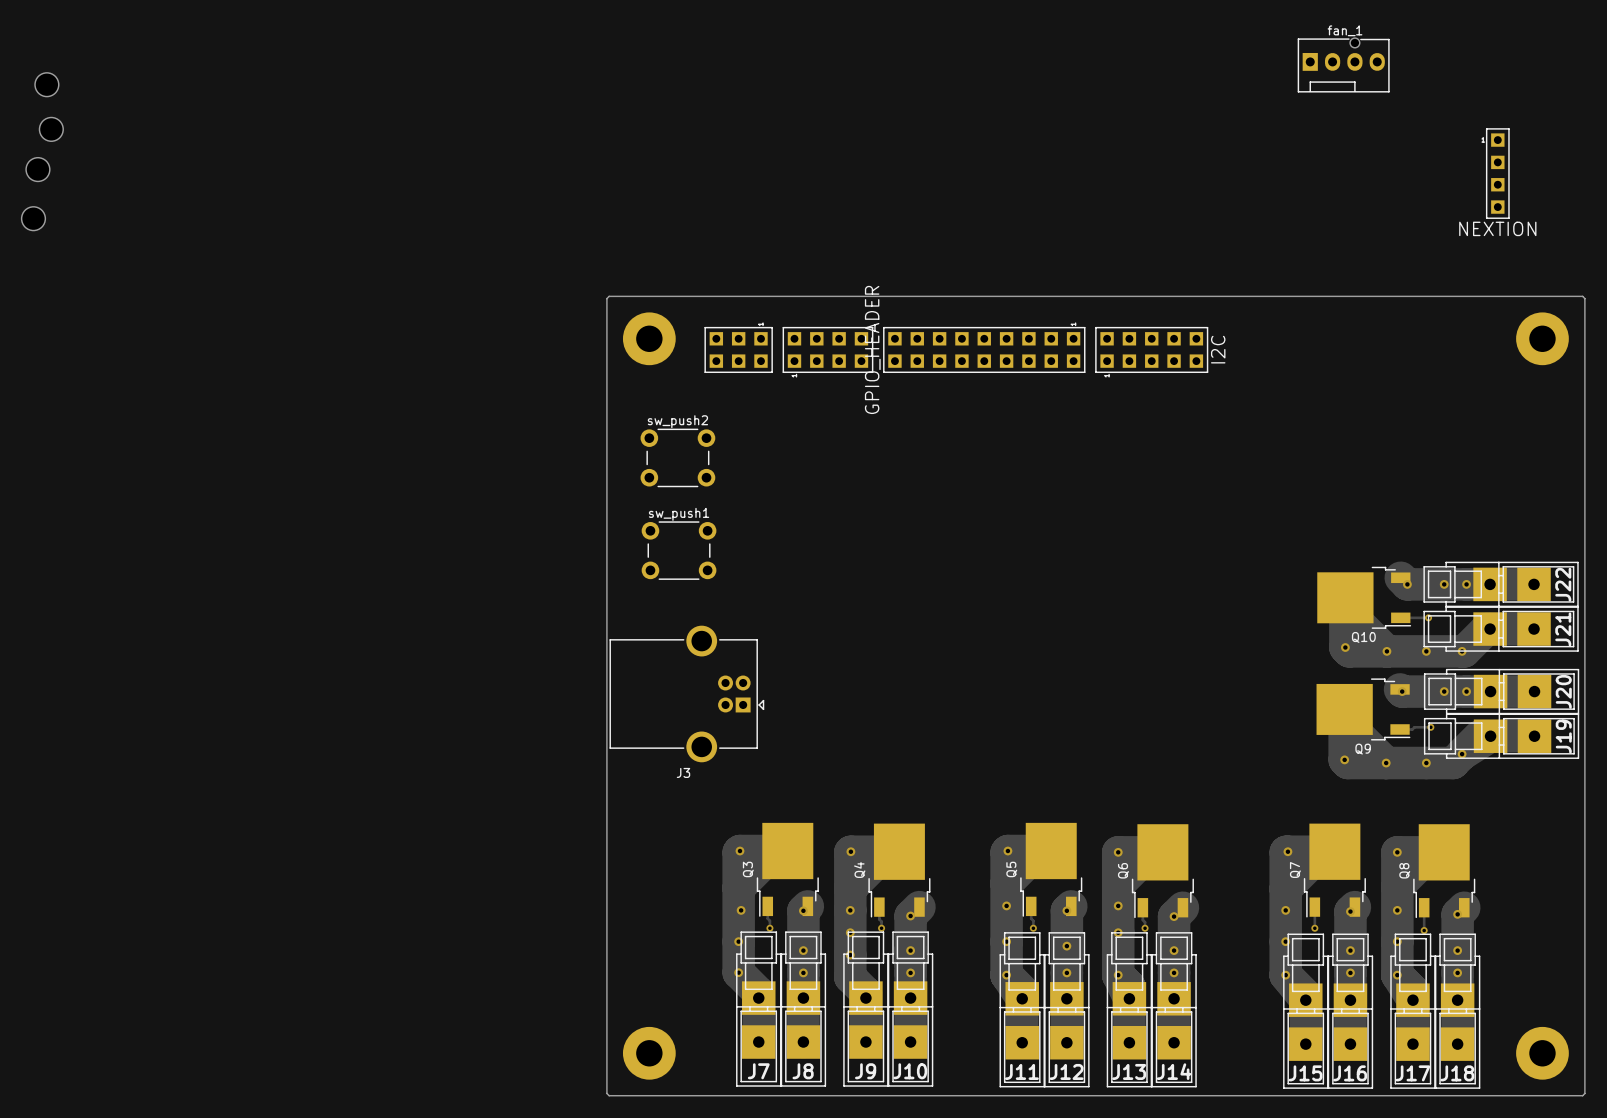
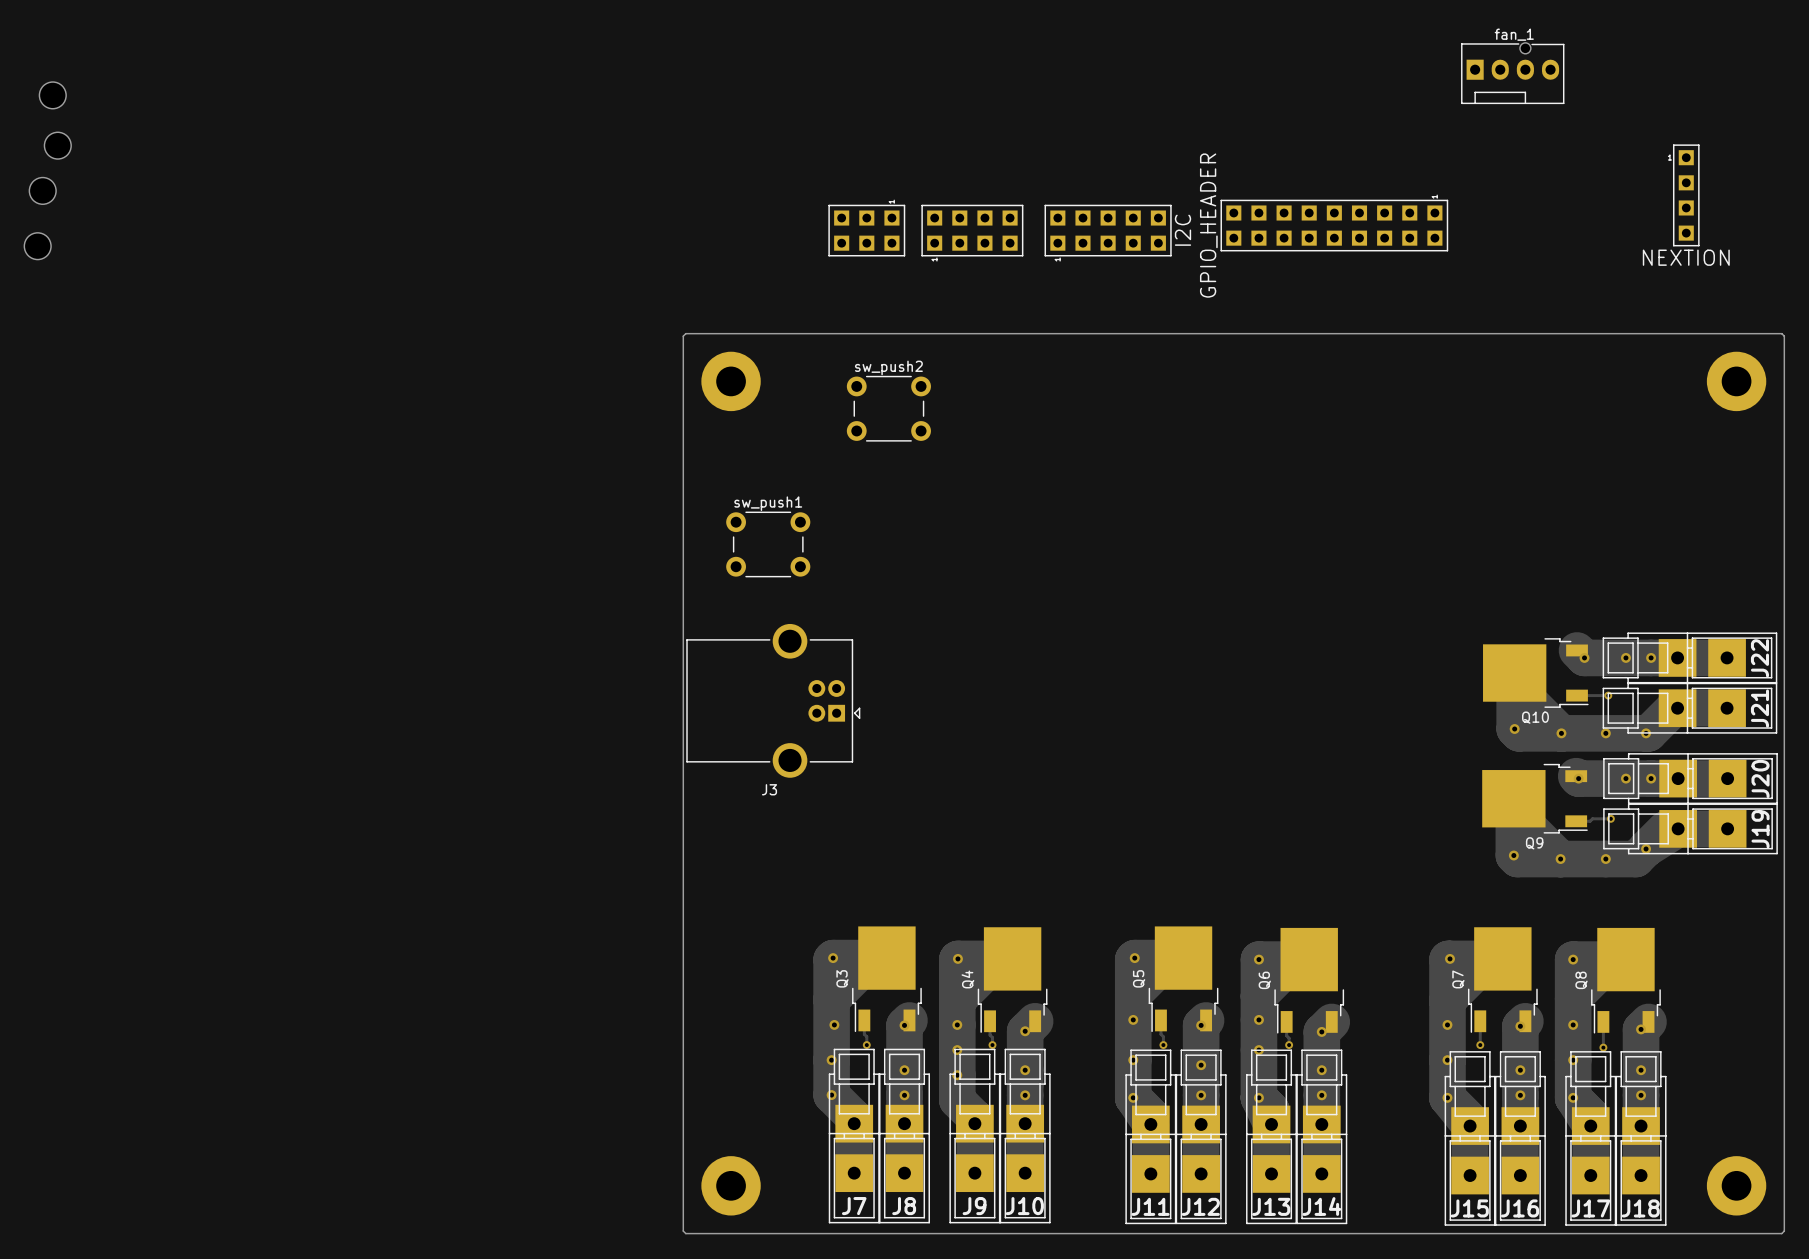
part: none -> GPIO_HEADER (1334, 225)
part: none -> I2C (1108, 230)
part position: (738, 349) -> (866, 230)
part position: (827, 349) -> (972, 230)
part: GPIO_HEADER (984, 349) -> none
part: I2C (1151, 349) -> none
sw_push2 position: (677, 457) -> (888, 408)
sw_push1 position: (679, 550) -> (768, 544)
J3 position: (686, 693) -> (773, 700)

